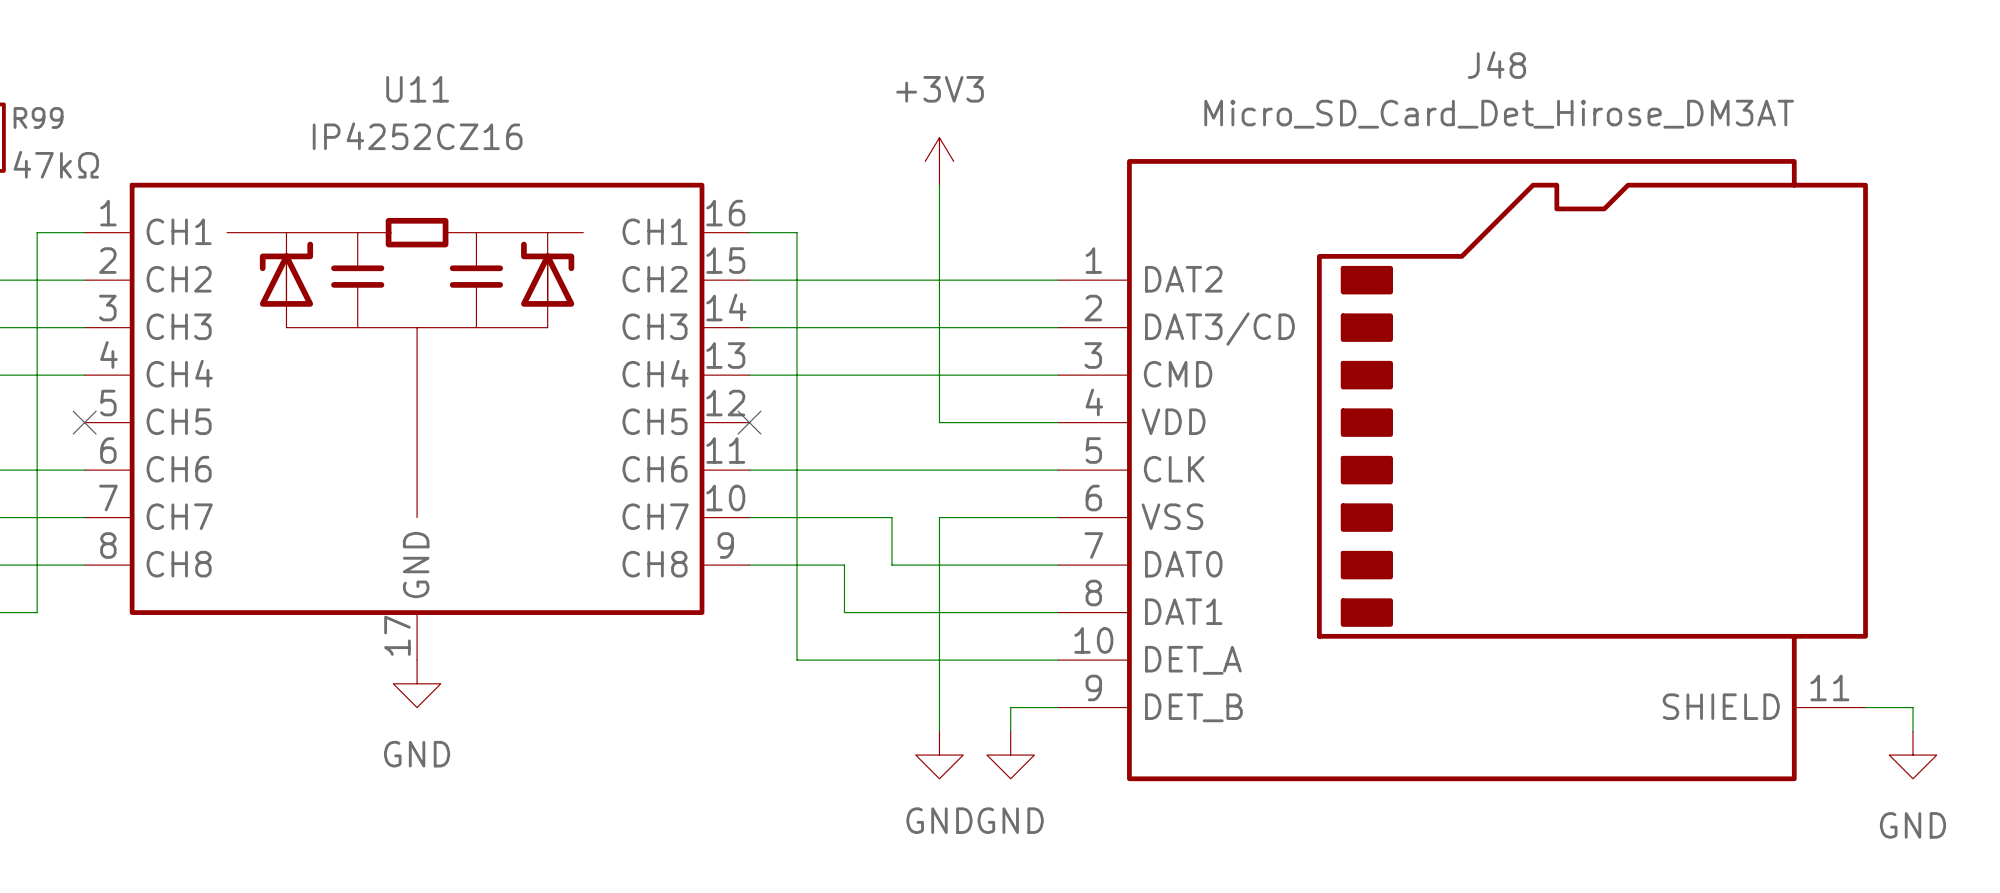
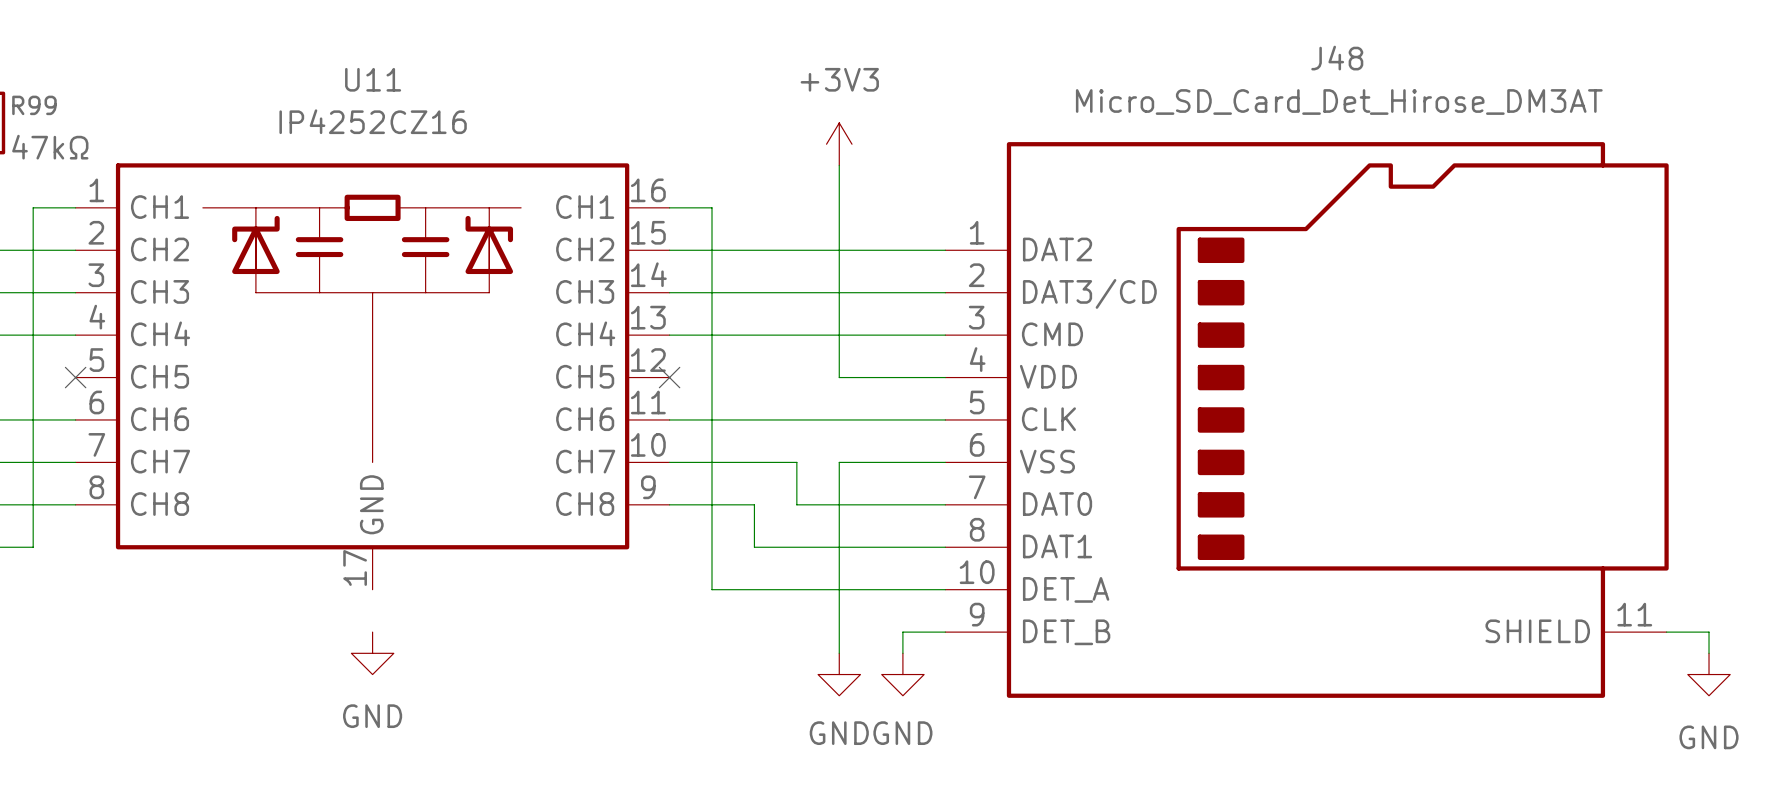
power symbol position: GND (417, 683) -> GND (372, 653)

